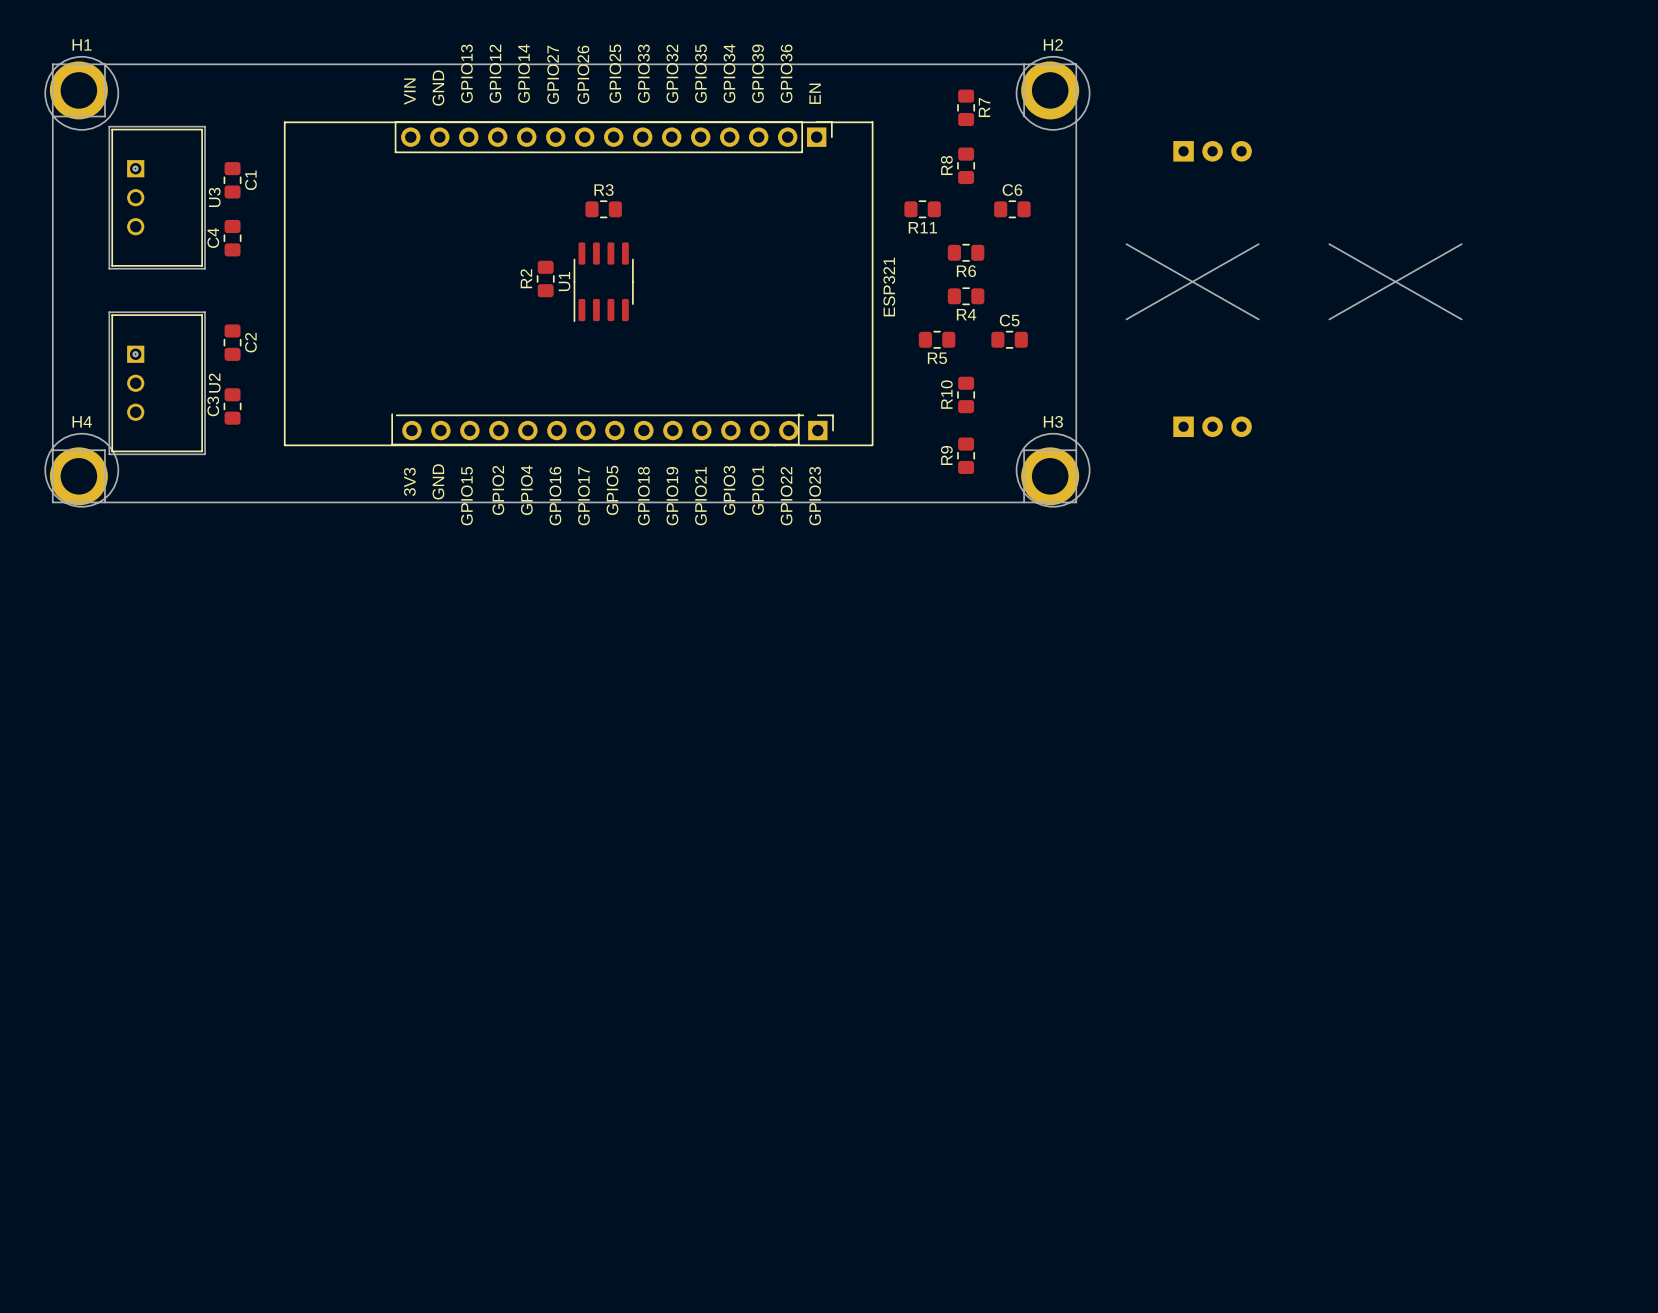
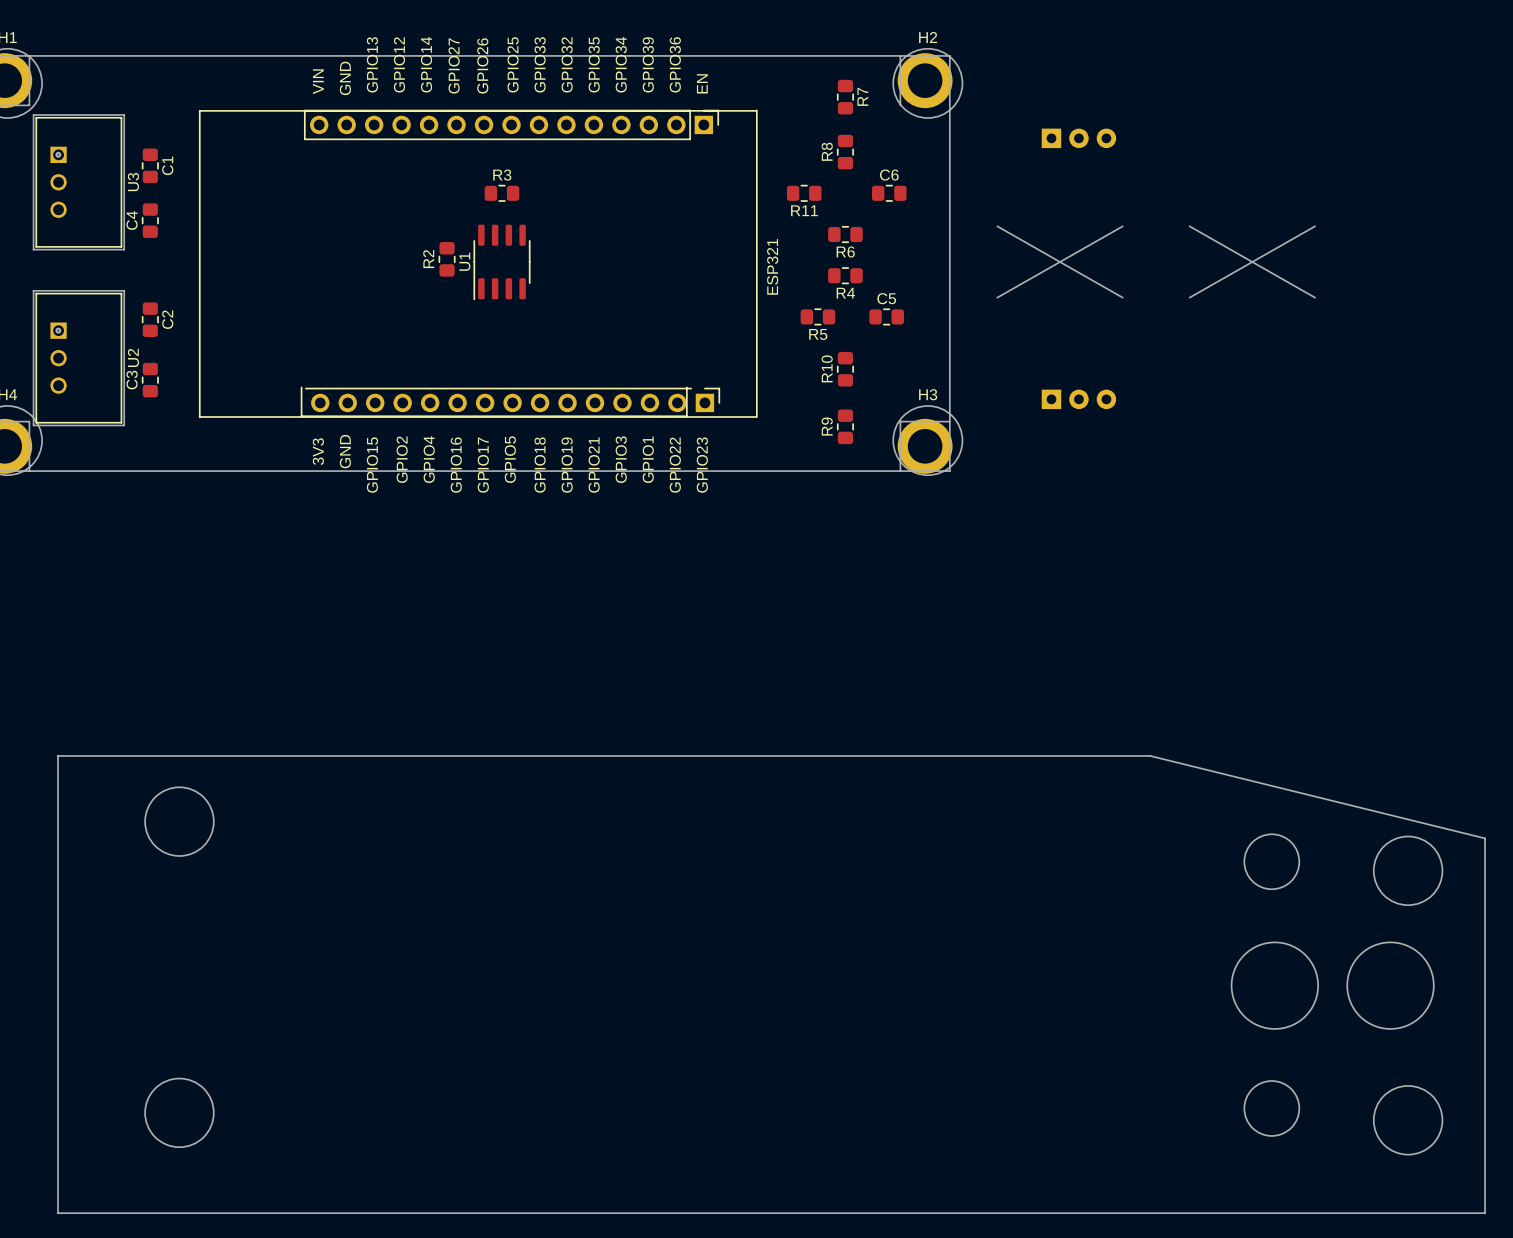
line: none -> (58, 755) (1150, 755) (1485, 838) (1485, 1213) (58, 1213) (58, 755)
drawing: none -> [144, 786, 215, 857]
drawing: none -> [1243, 833, 1301, 891]
drawing: none -> [1372, 835, 1444, 906]
drawing: none -> [1230, 941, 1319, 1030]
drawing: none -> [1346, 941, 1435, 1030]
drawing: none -> [144, 1077, 215, 1149]
drawing: none -> [1243, 1080, 1301, 1137]
drawing: none -> [1372, 1085, 1444, 1156]

